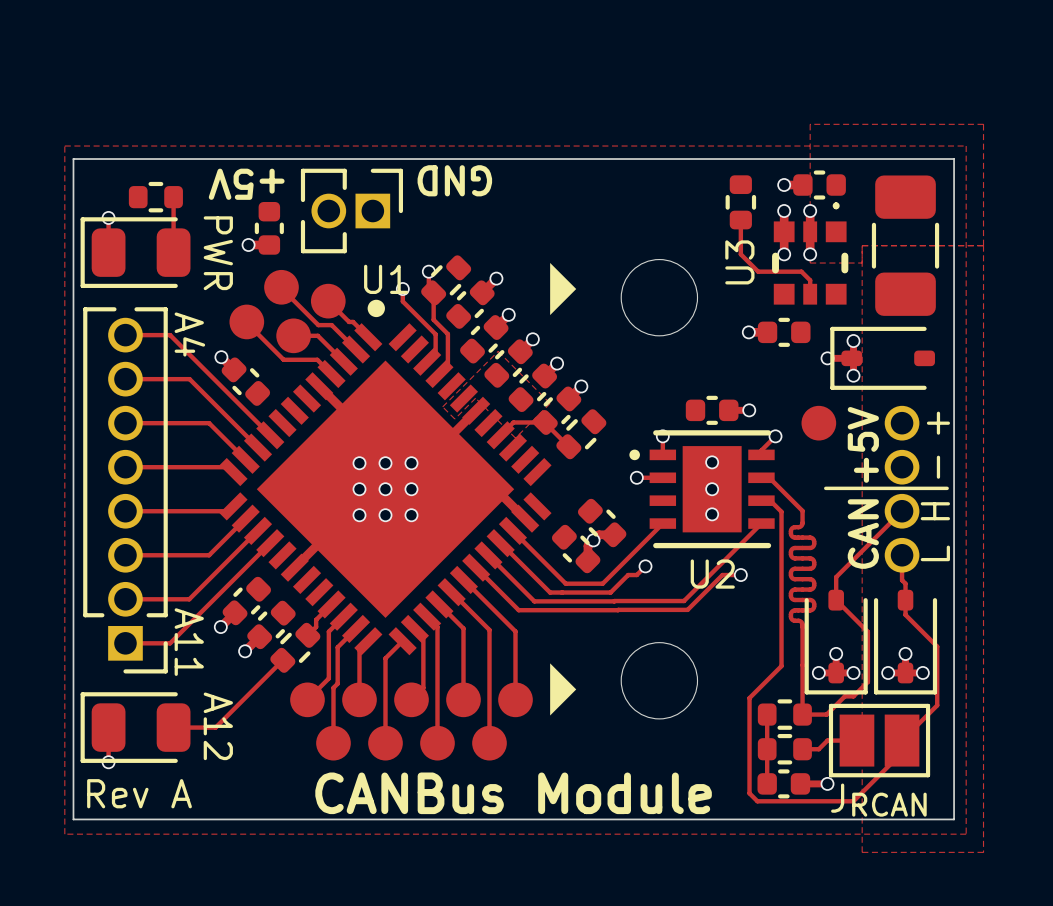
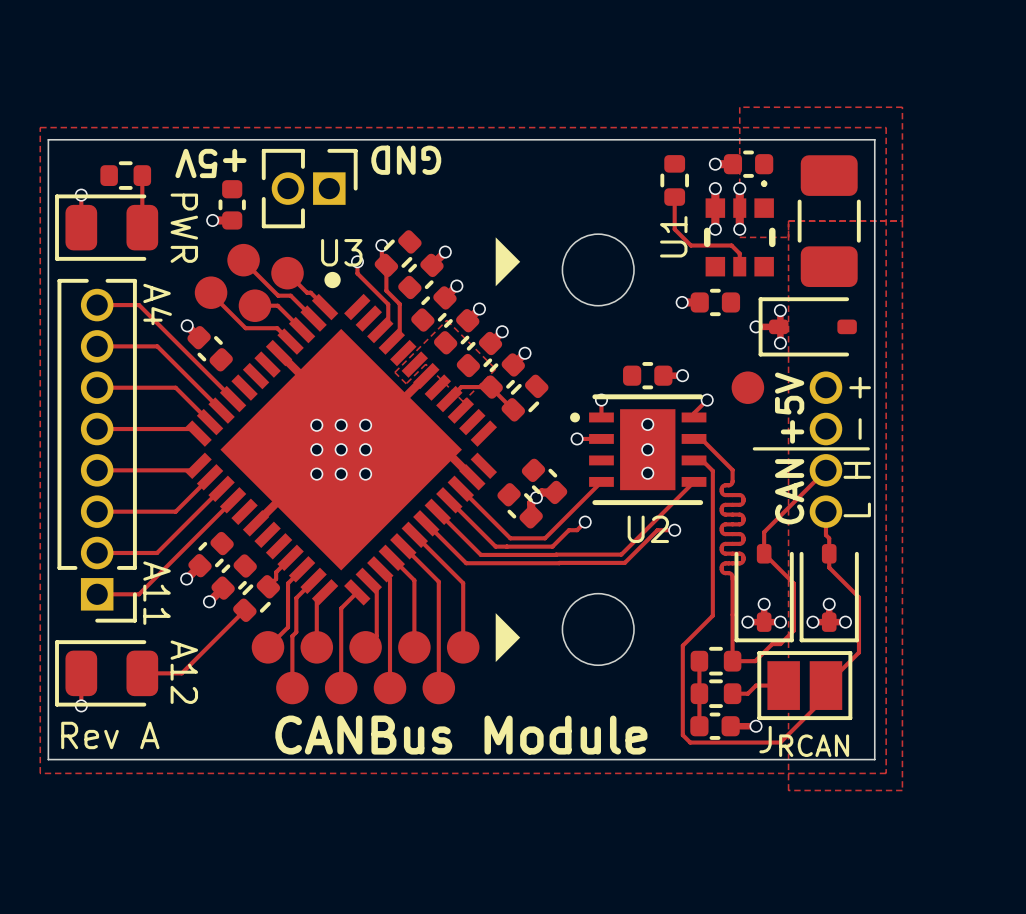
U3 name: U3 (739, 262) -> U1 (673, 236)
U1 name: U1 (386, 279) -> U3 (341, 252)

